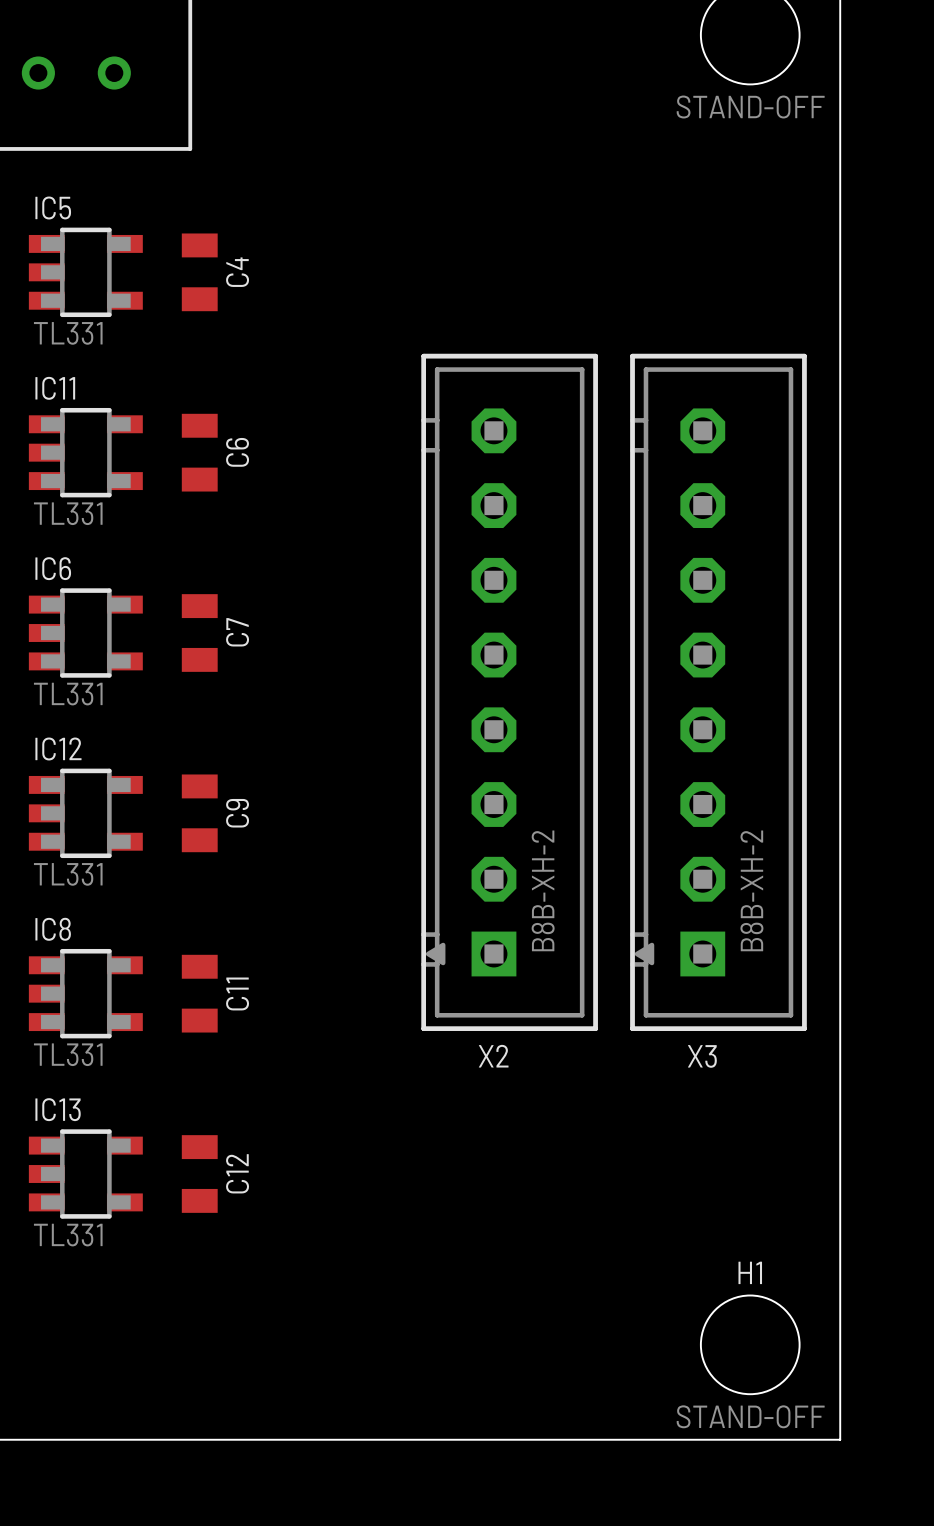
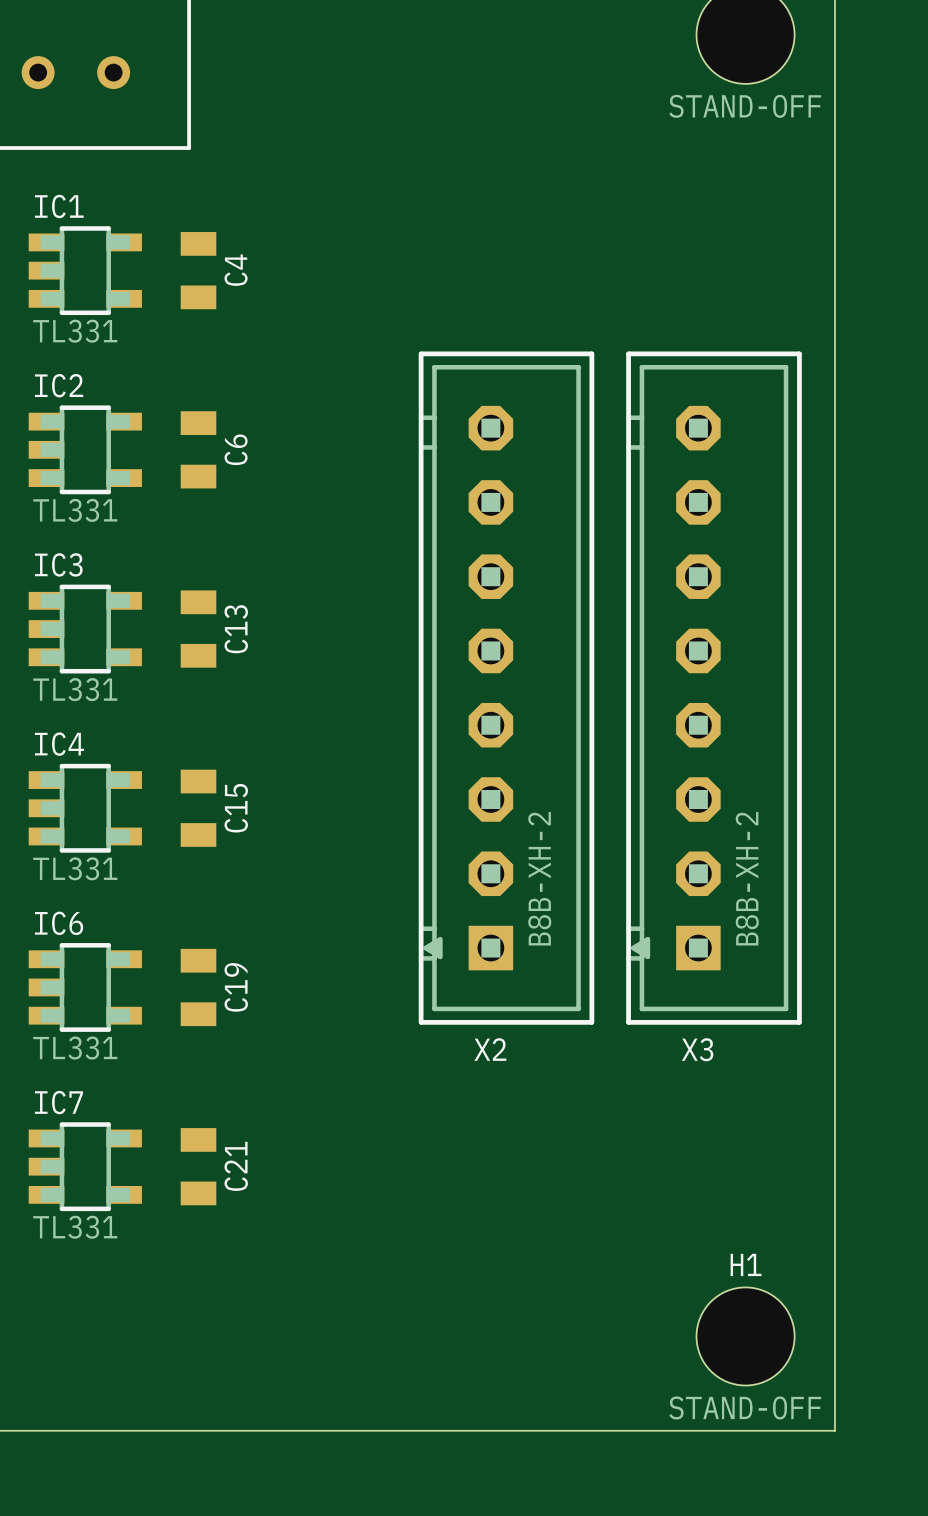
IC5 name: IC5 (53, 207) -> IC1 (59, 206)
IC11 name: IC11 (55, 388) -> IC2 (59, 385)
IC6 name: IC6 (53, 568) -> IC3 (58, 564)
C7 name: C7 (237, 632) -> C13 (236, 629)
IC12 name: IC12 (58, 748) -> IC4 (59, 744)
C9 name: C9 (237, 813) -> C15 (236, 808)
IC8 name: IC8 (53, 929) -> IC6 (59, 923)
C11 name: C11 (237, 993) -> C19 (236, 987)
IC13 name: IC13 (58, 1109) -> IC7 (58, 1102)
C12 name: C12 (237, 1173) -> C21 (236, 1166)

